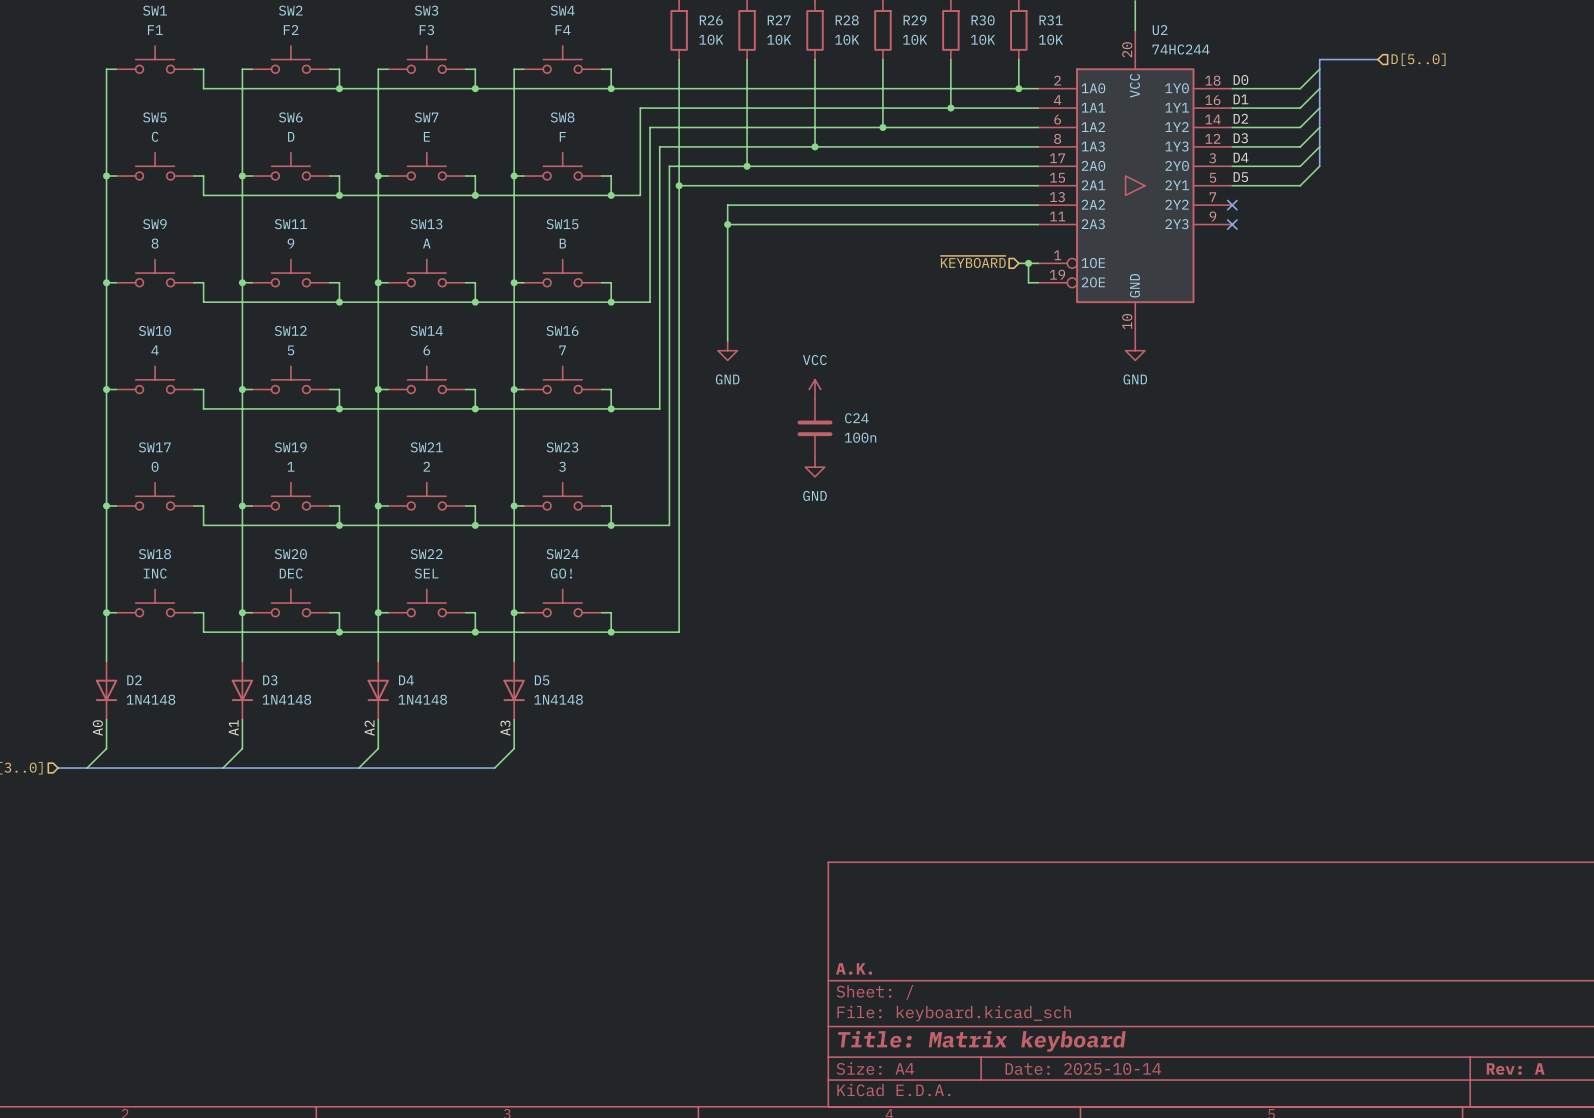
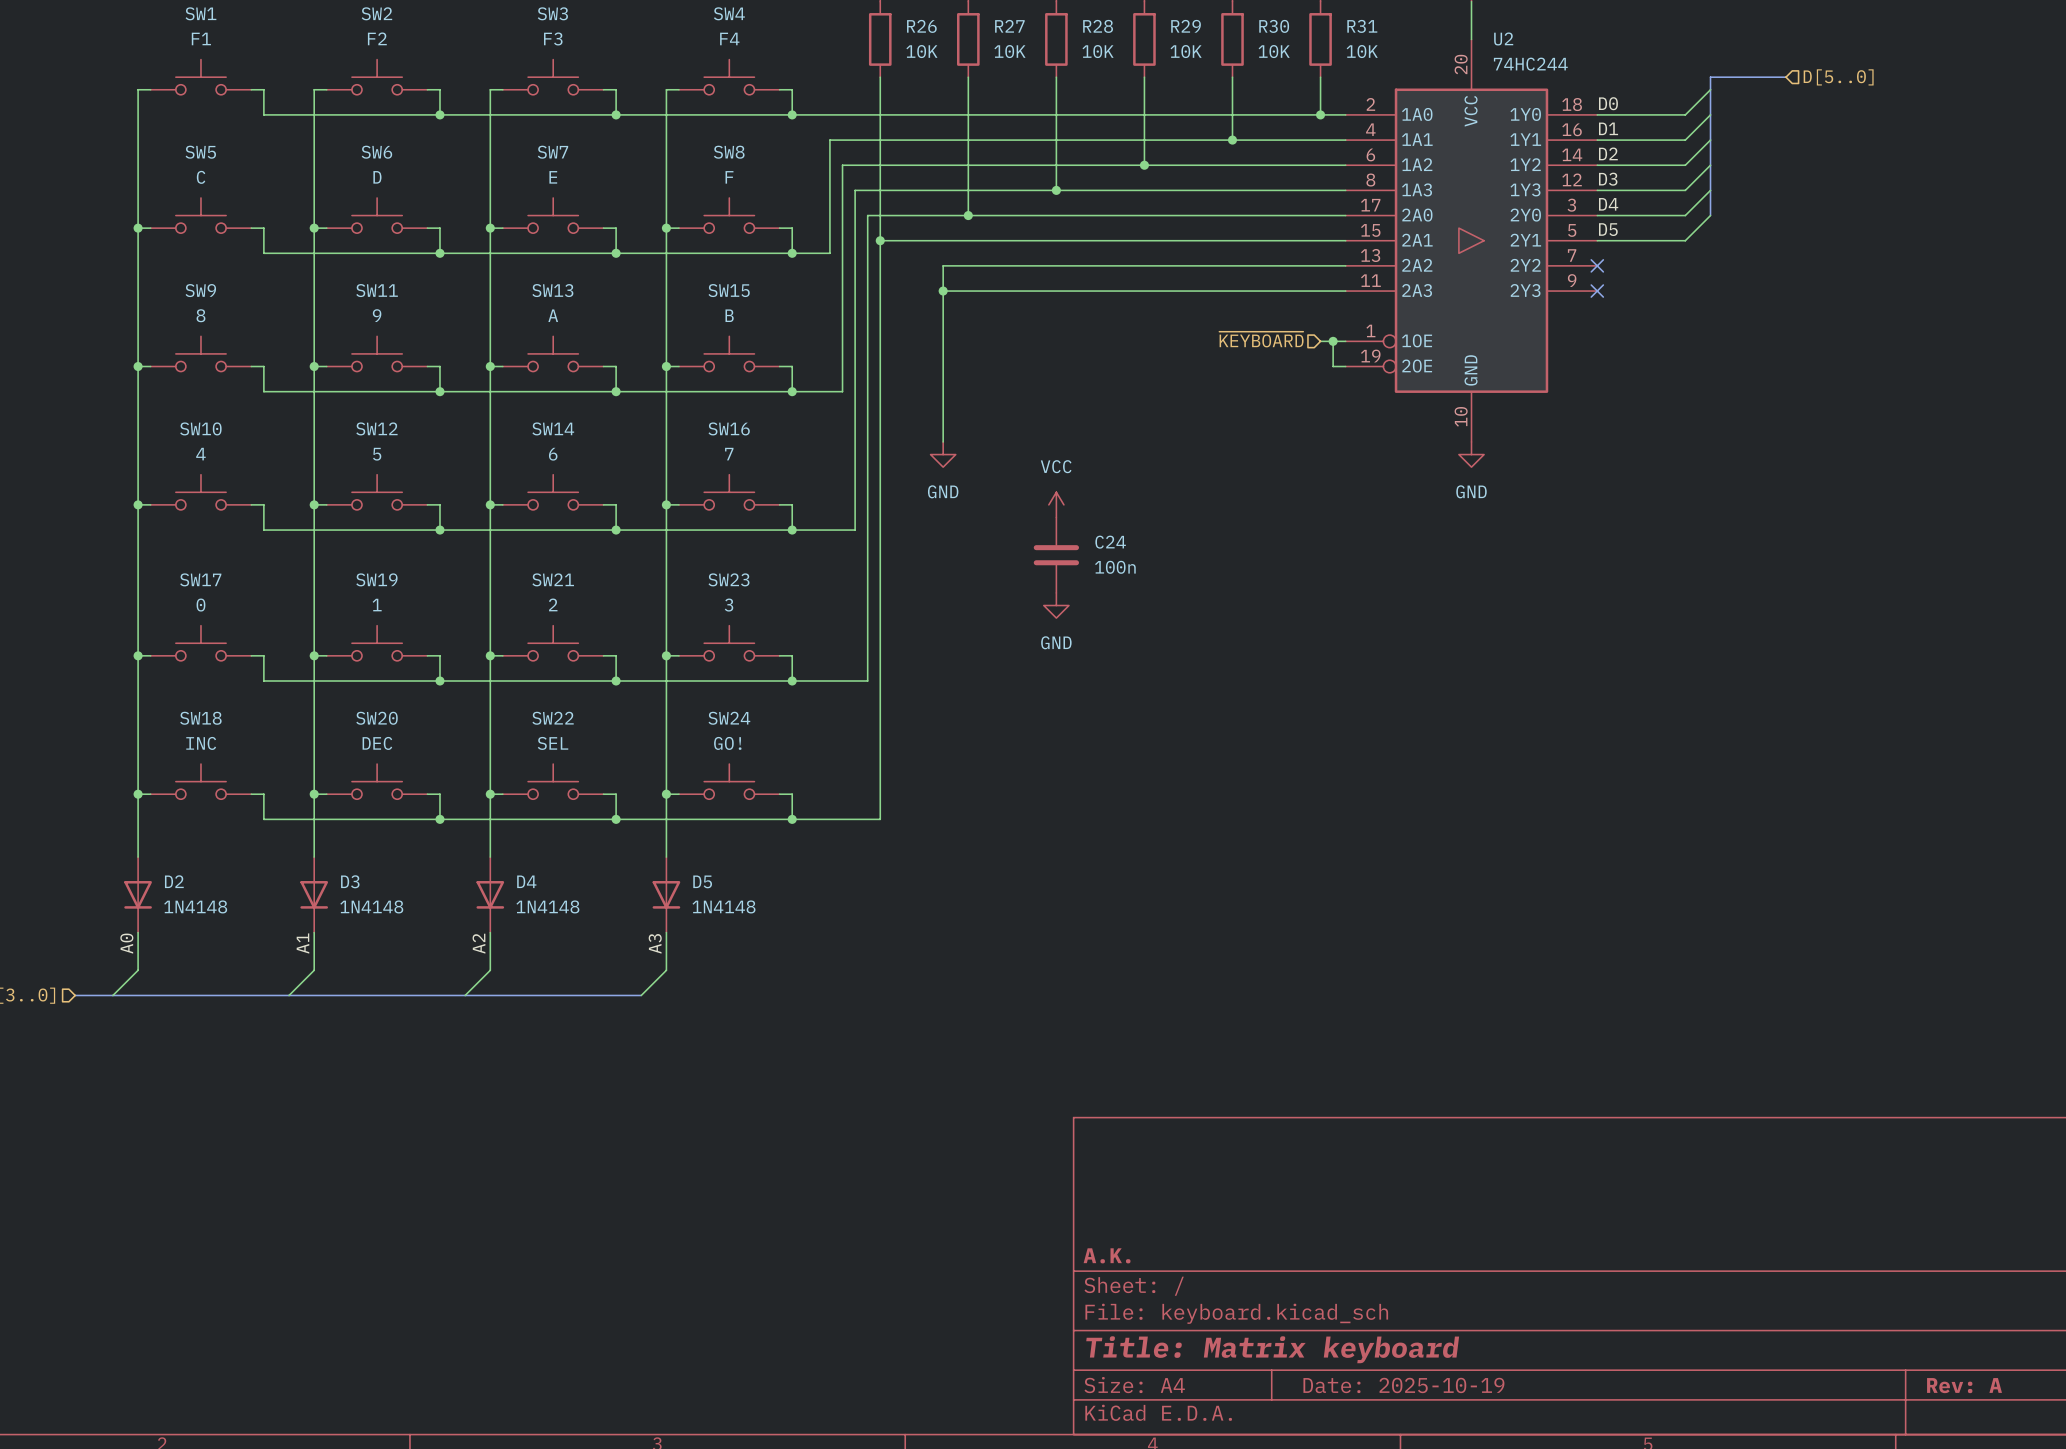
title block: Date: 2025-10-14 (1083, 1068) -> Date: 2025-10-19 (1403, 1385)

